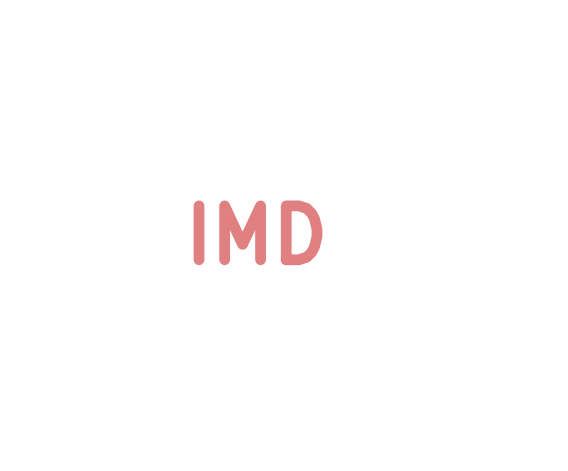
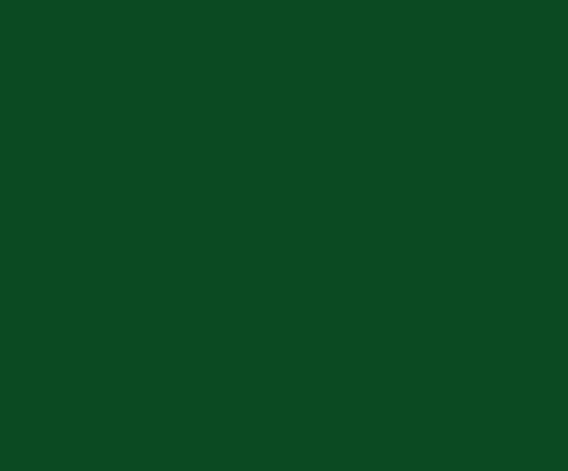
text: IMD (257, 232) -> none

